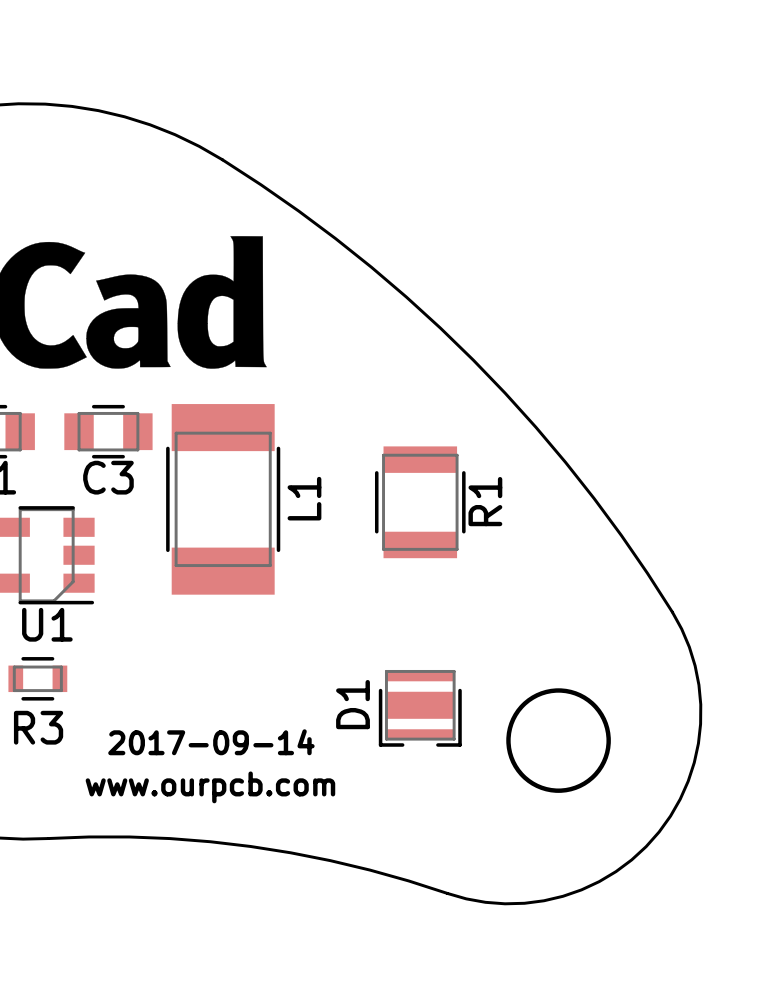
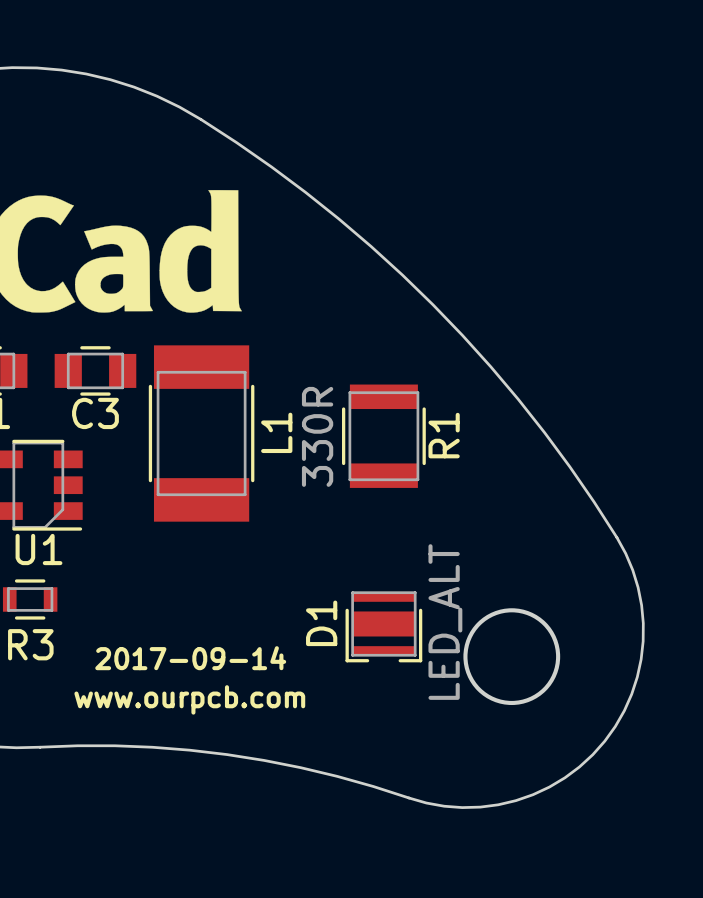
R1 value: none -> 330R (317, 436)
D1 value: none -> LED_ALT (445, 622)

